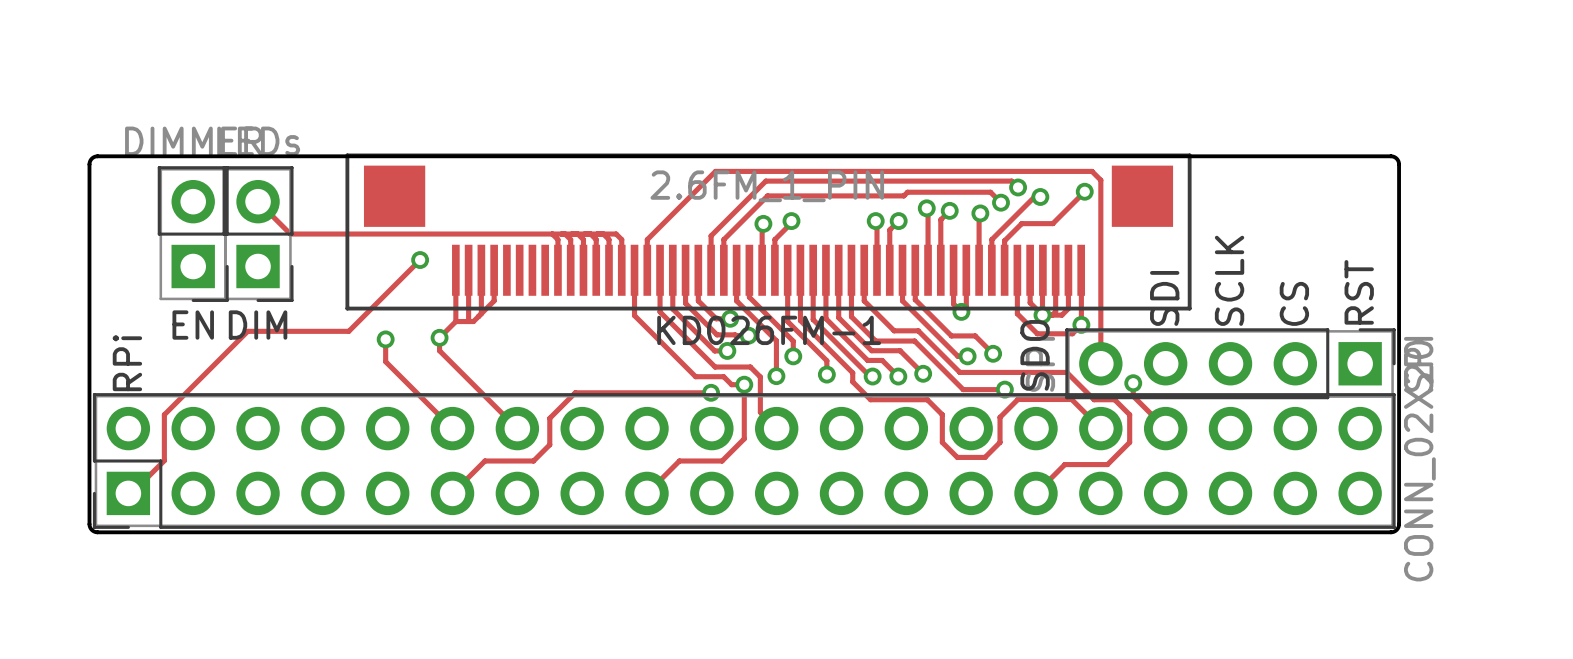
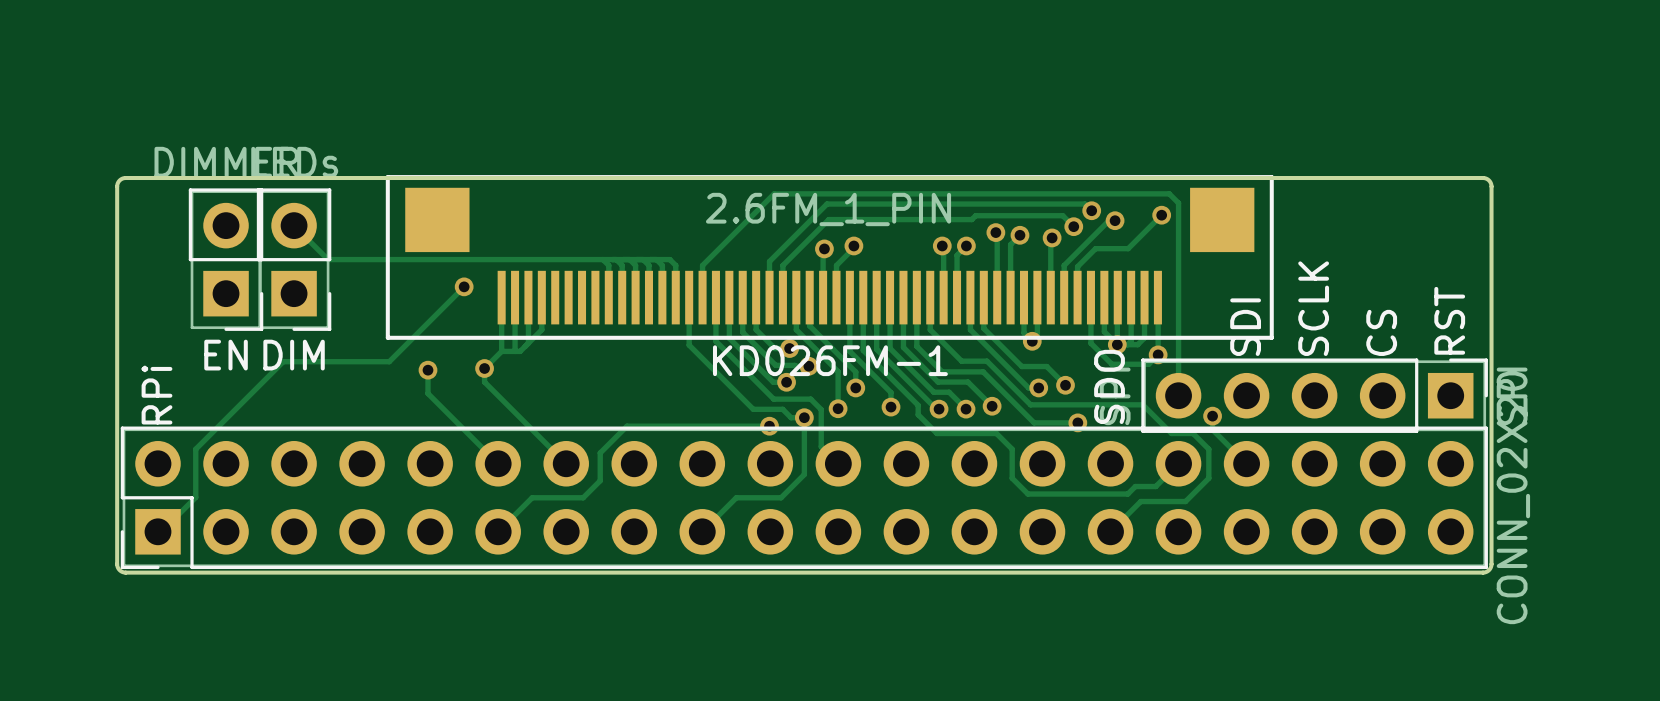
track: (1100, 428) (1071, 399) (1017, 399) (1000, 417) (1000, 442) (985, 457) -> (1178, 463) (1155, 486) (1135, 486) (1127, 494) (1057, 494)

